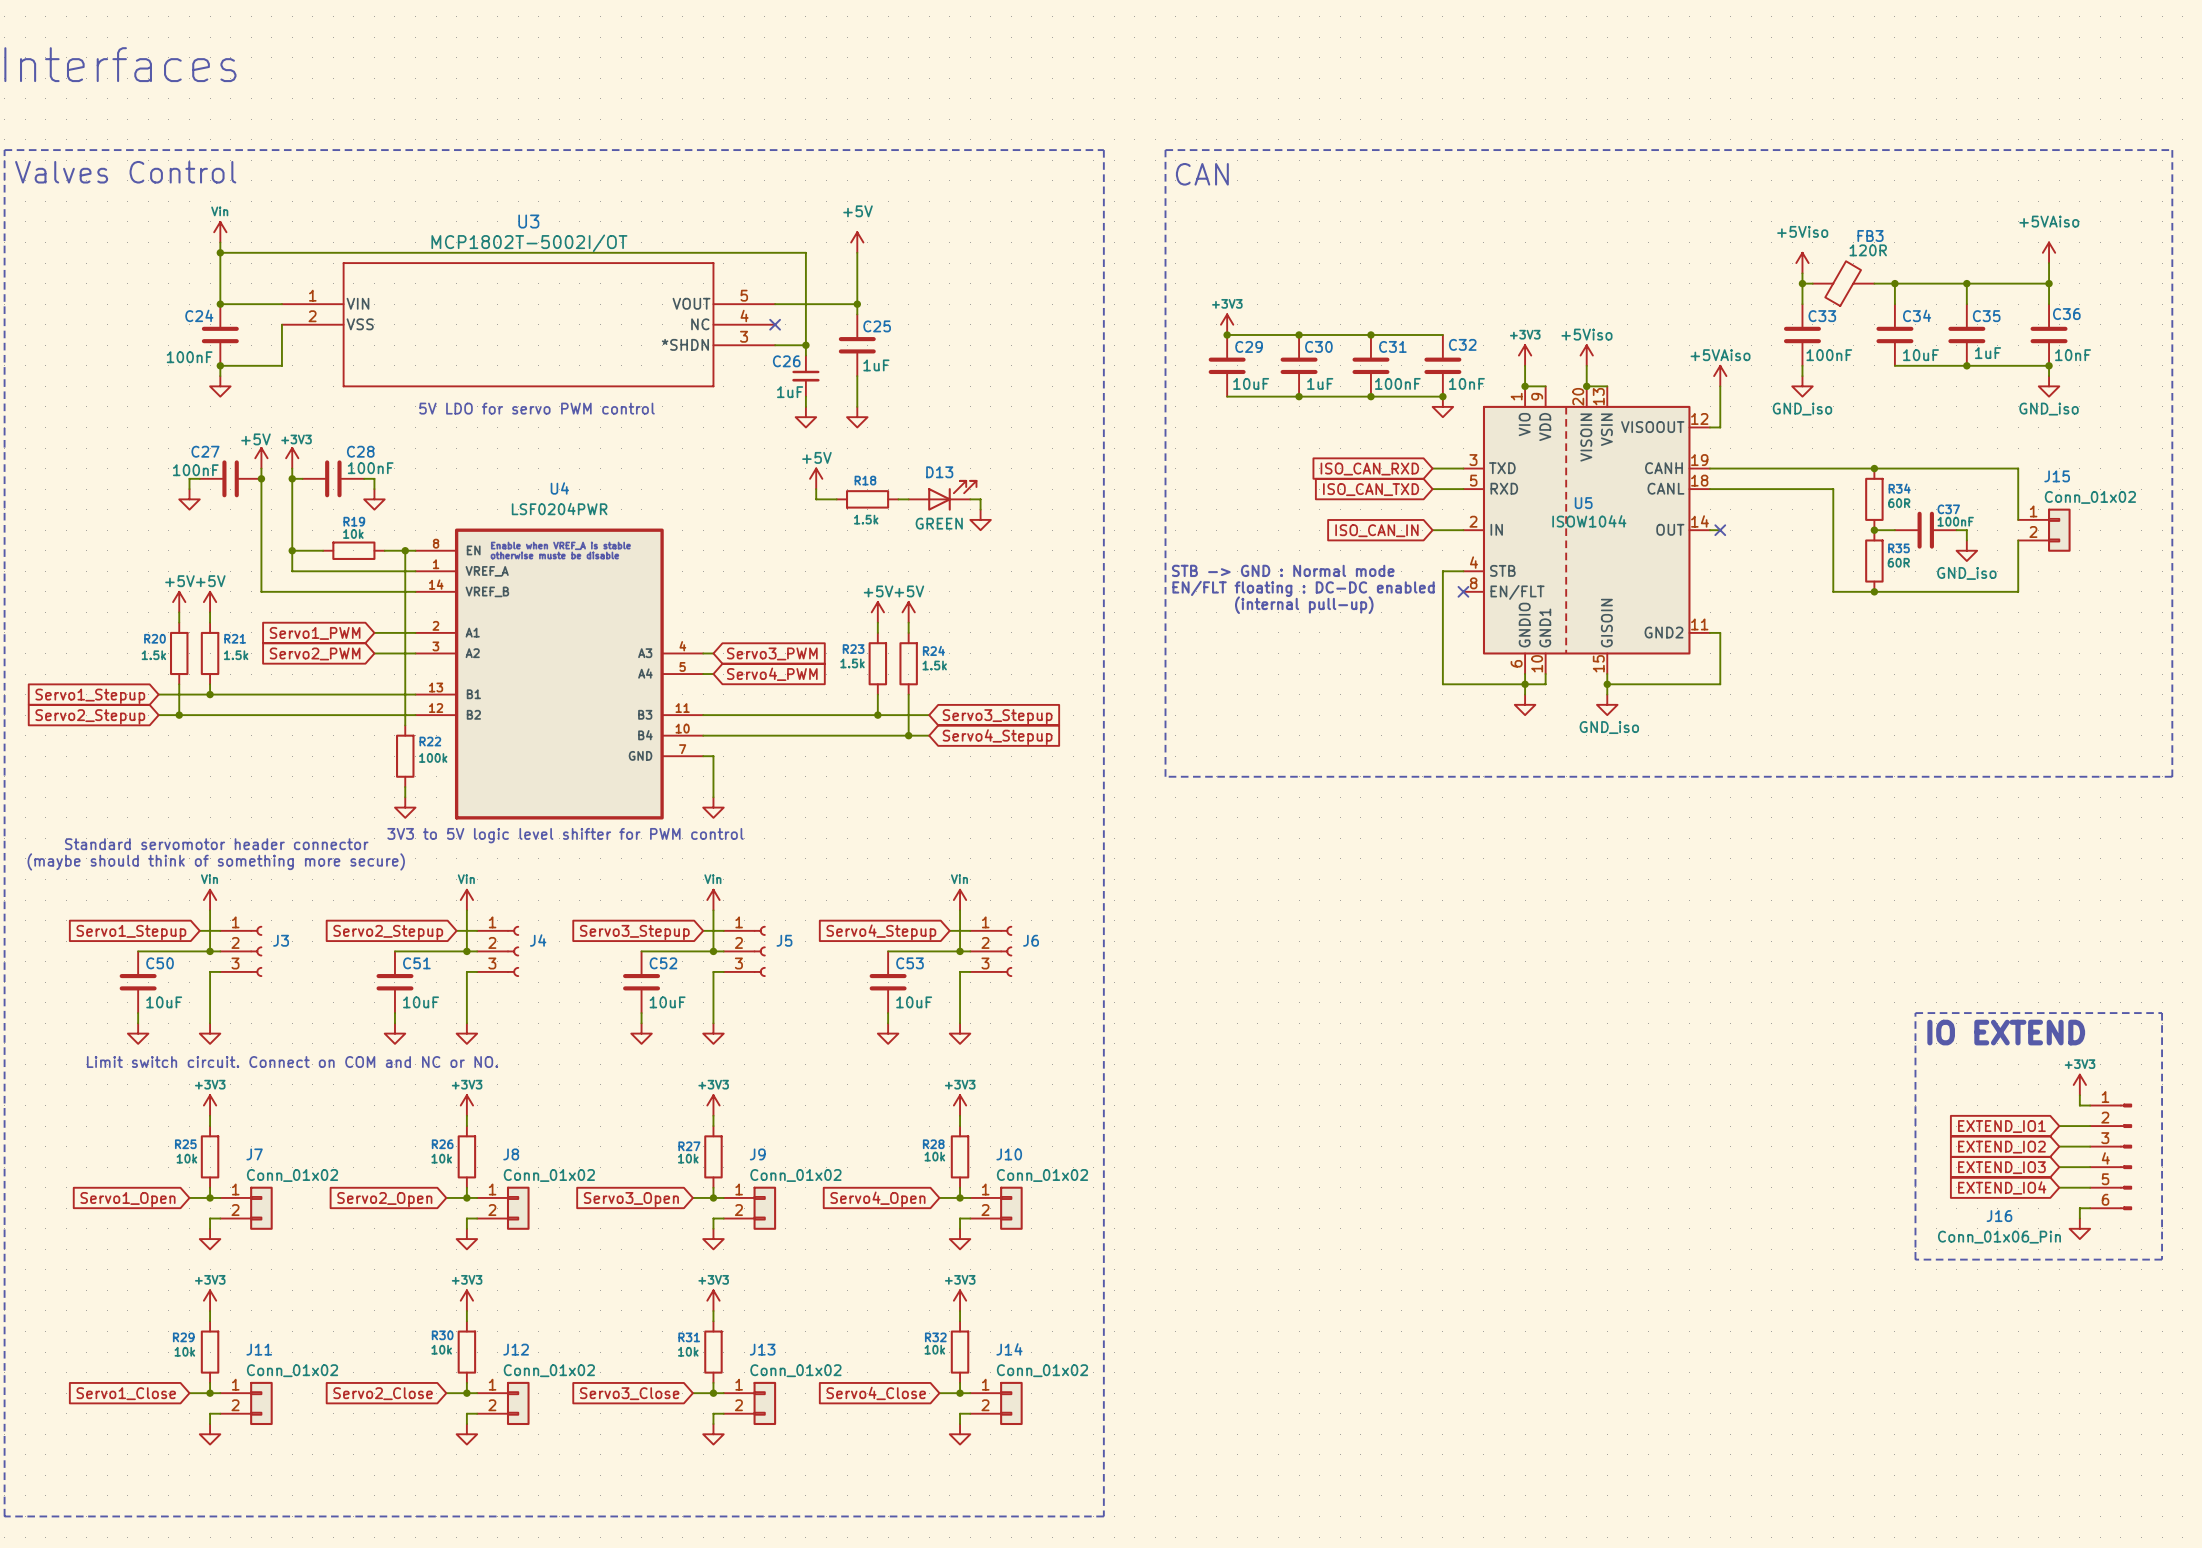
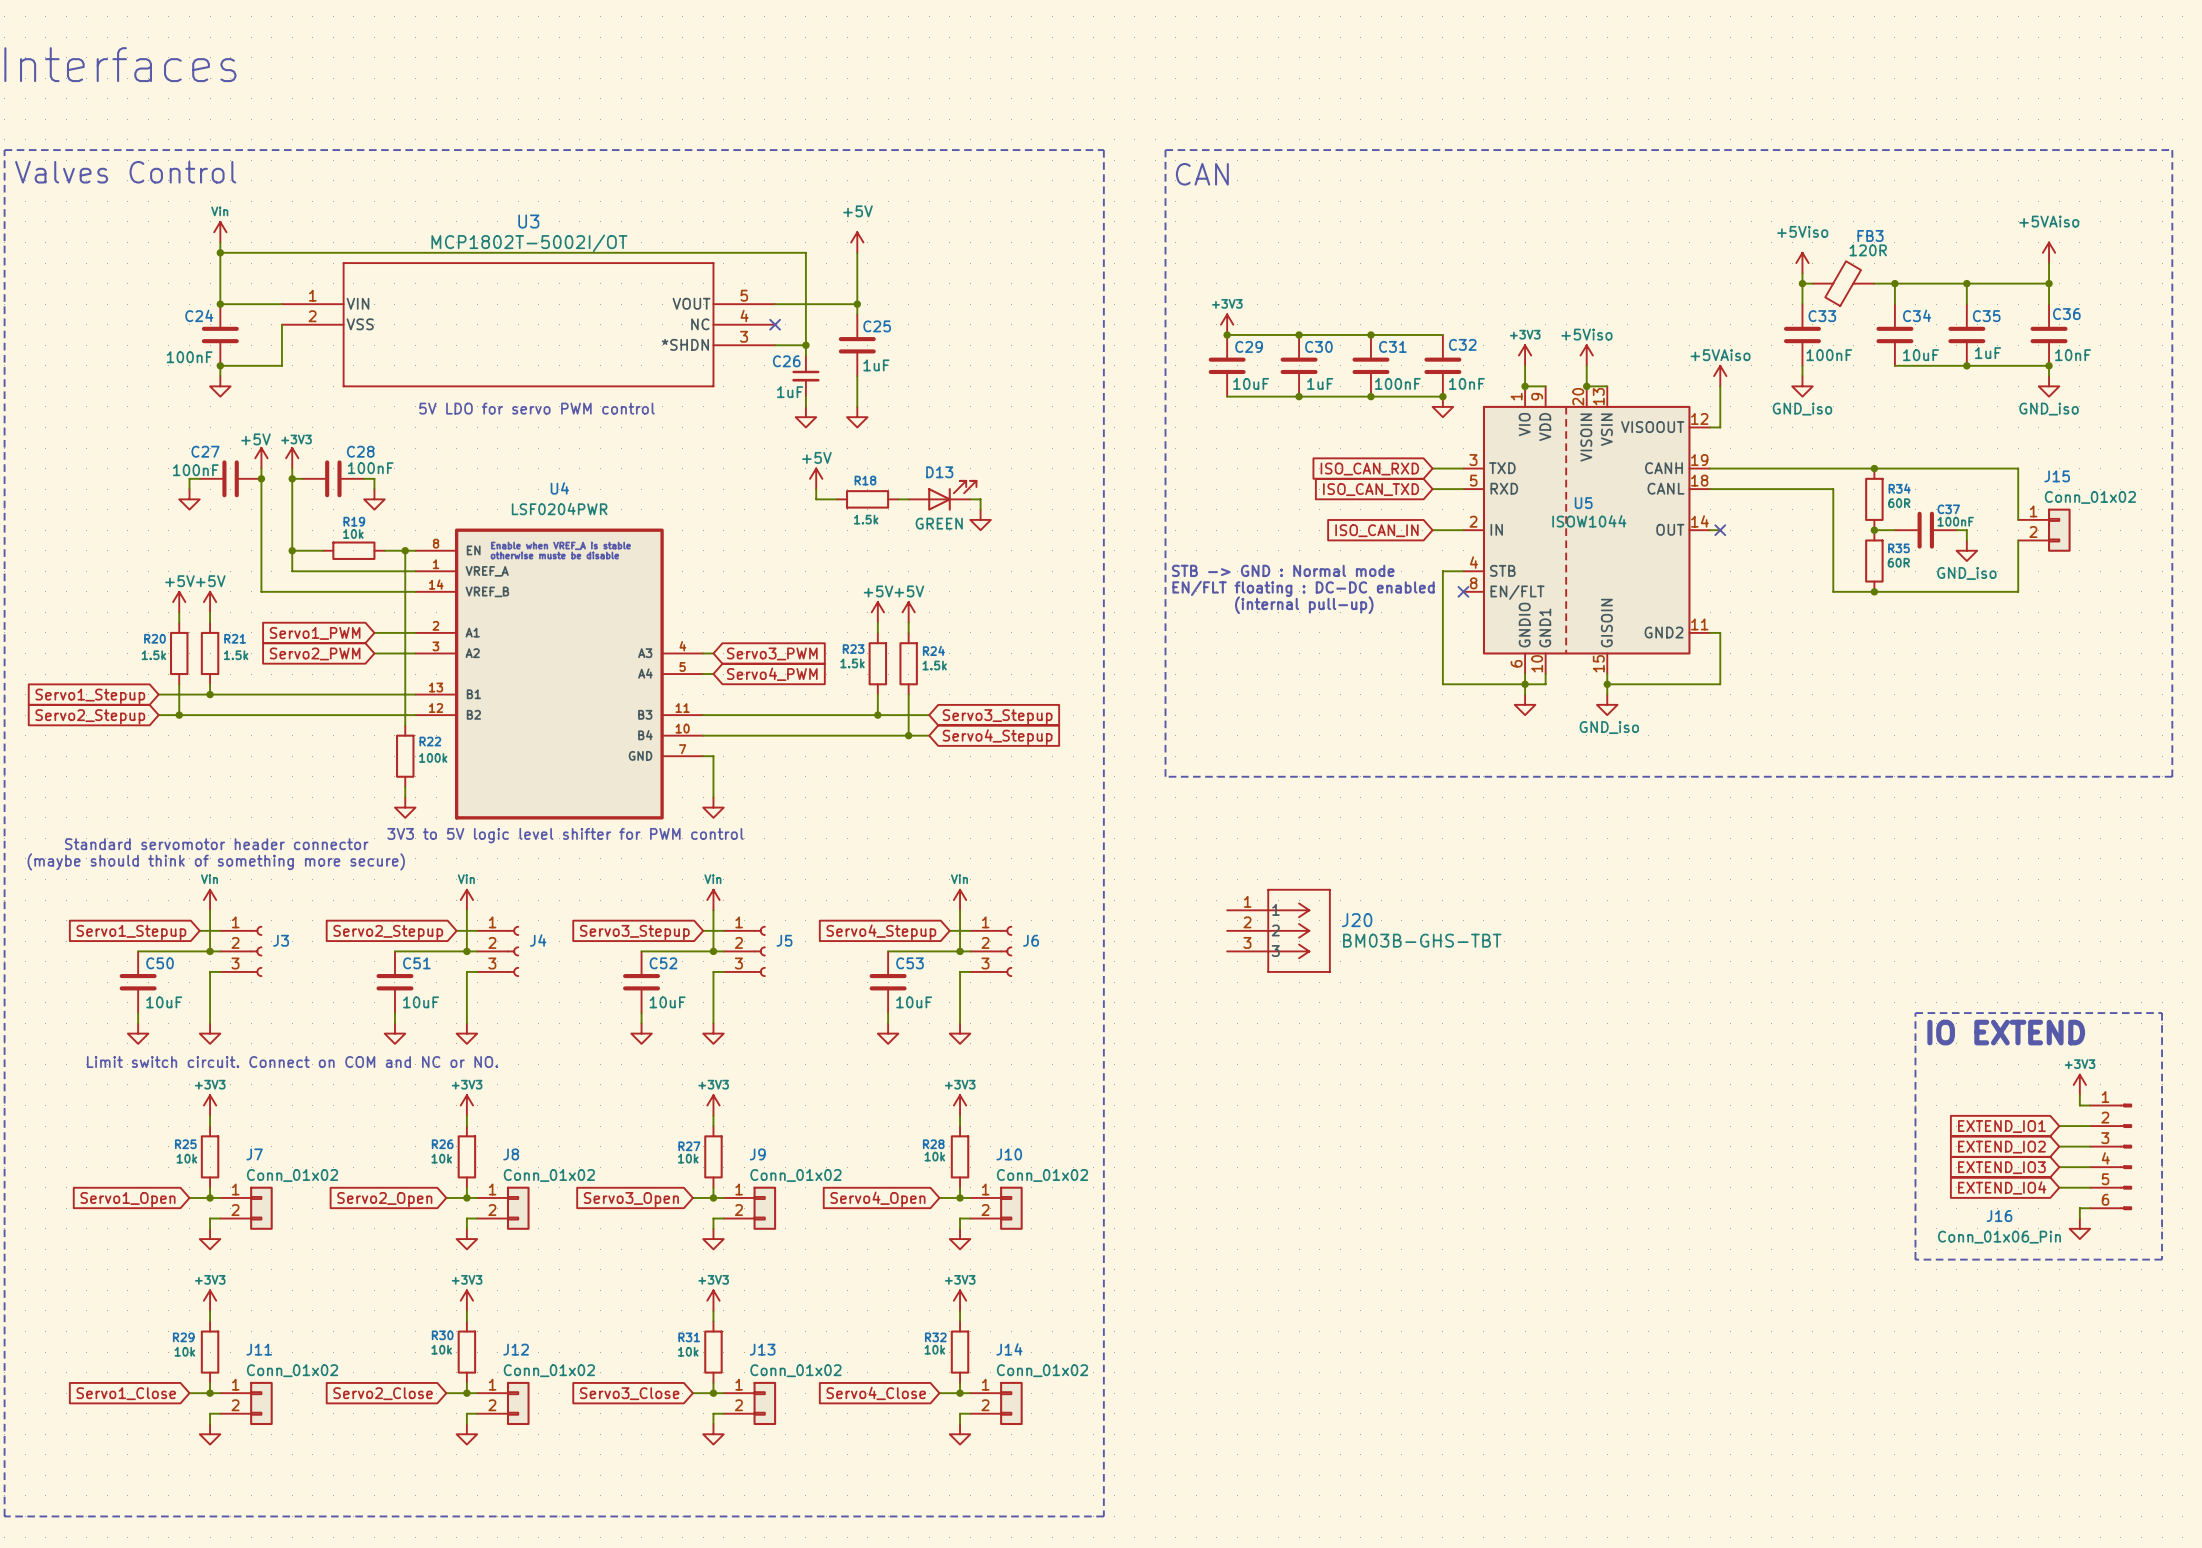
J20: none -> BM03B-GHS-TBT (1278, 930)

